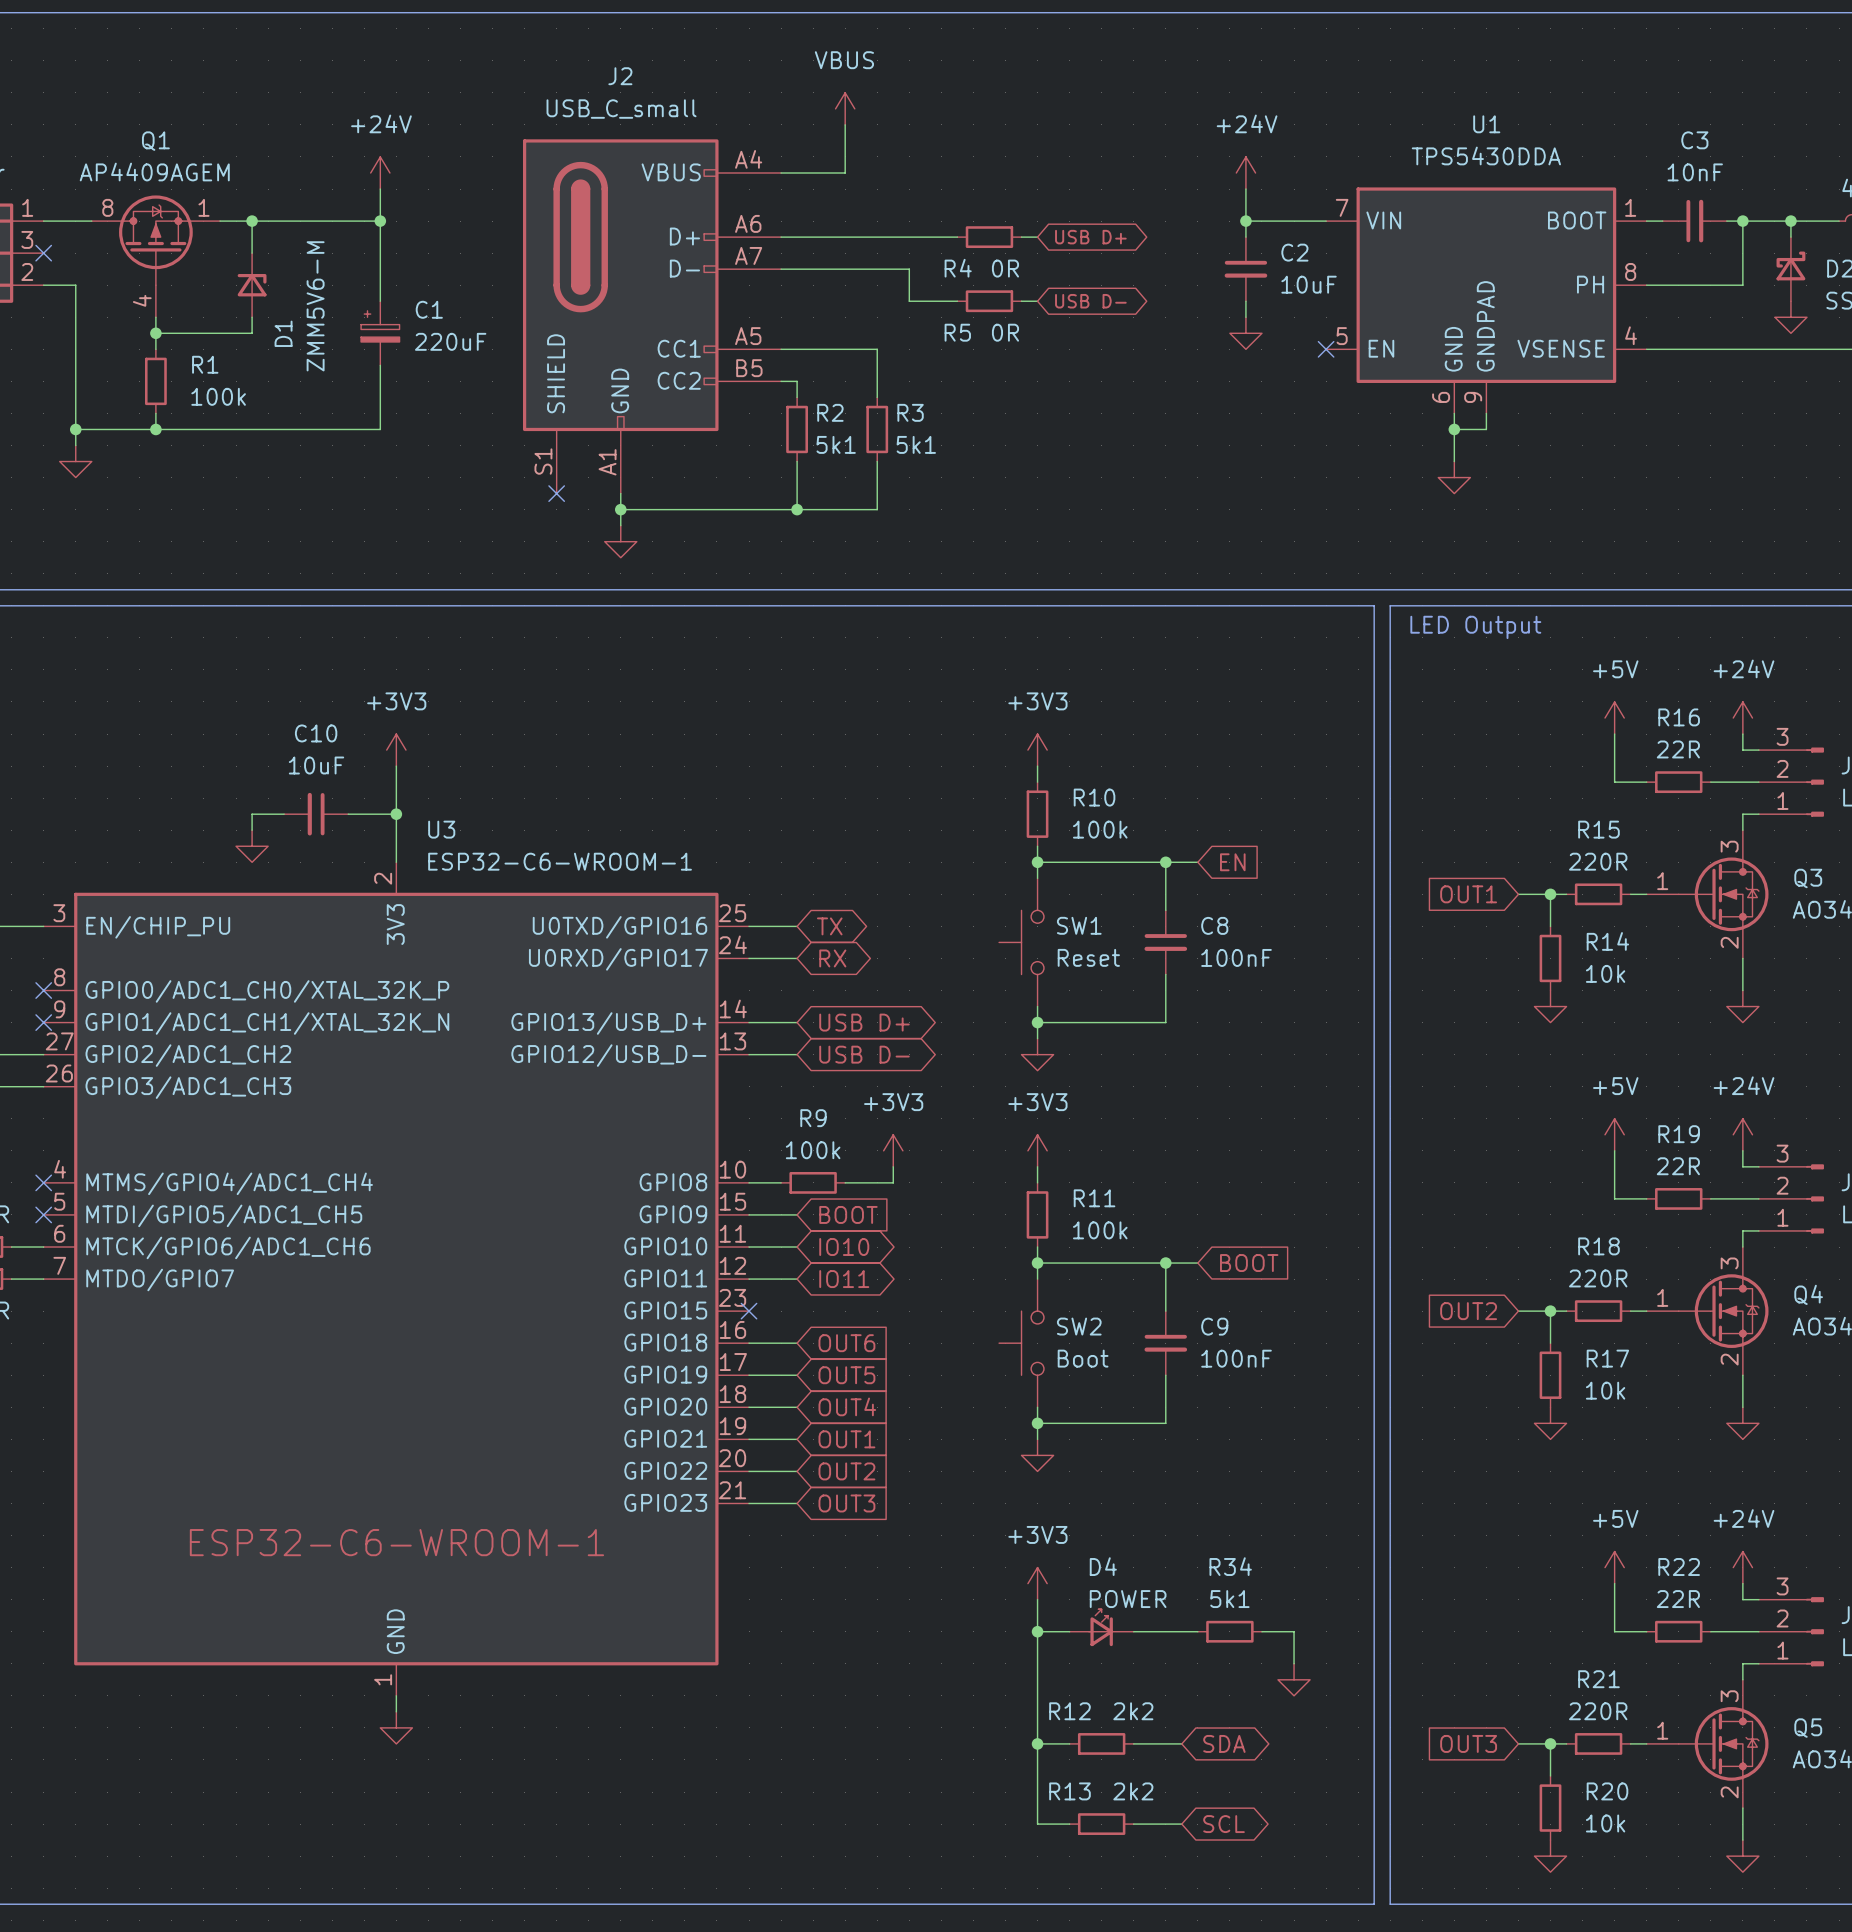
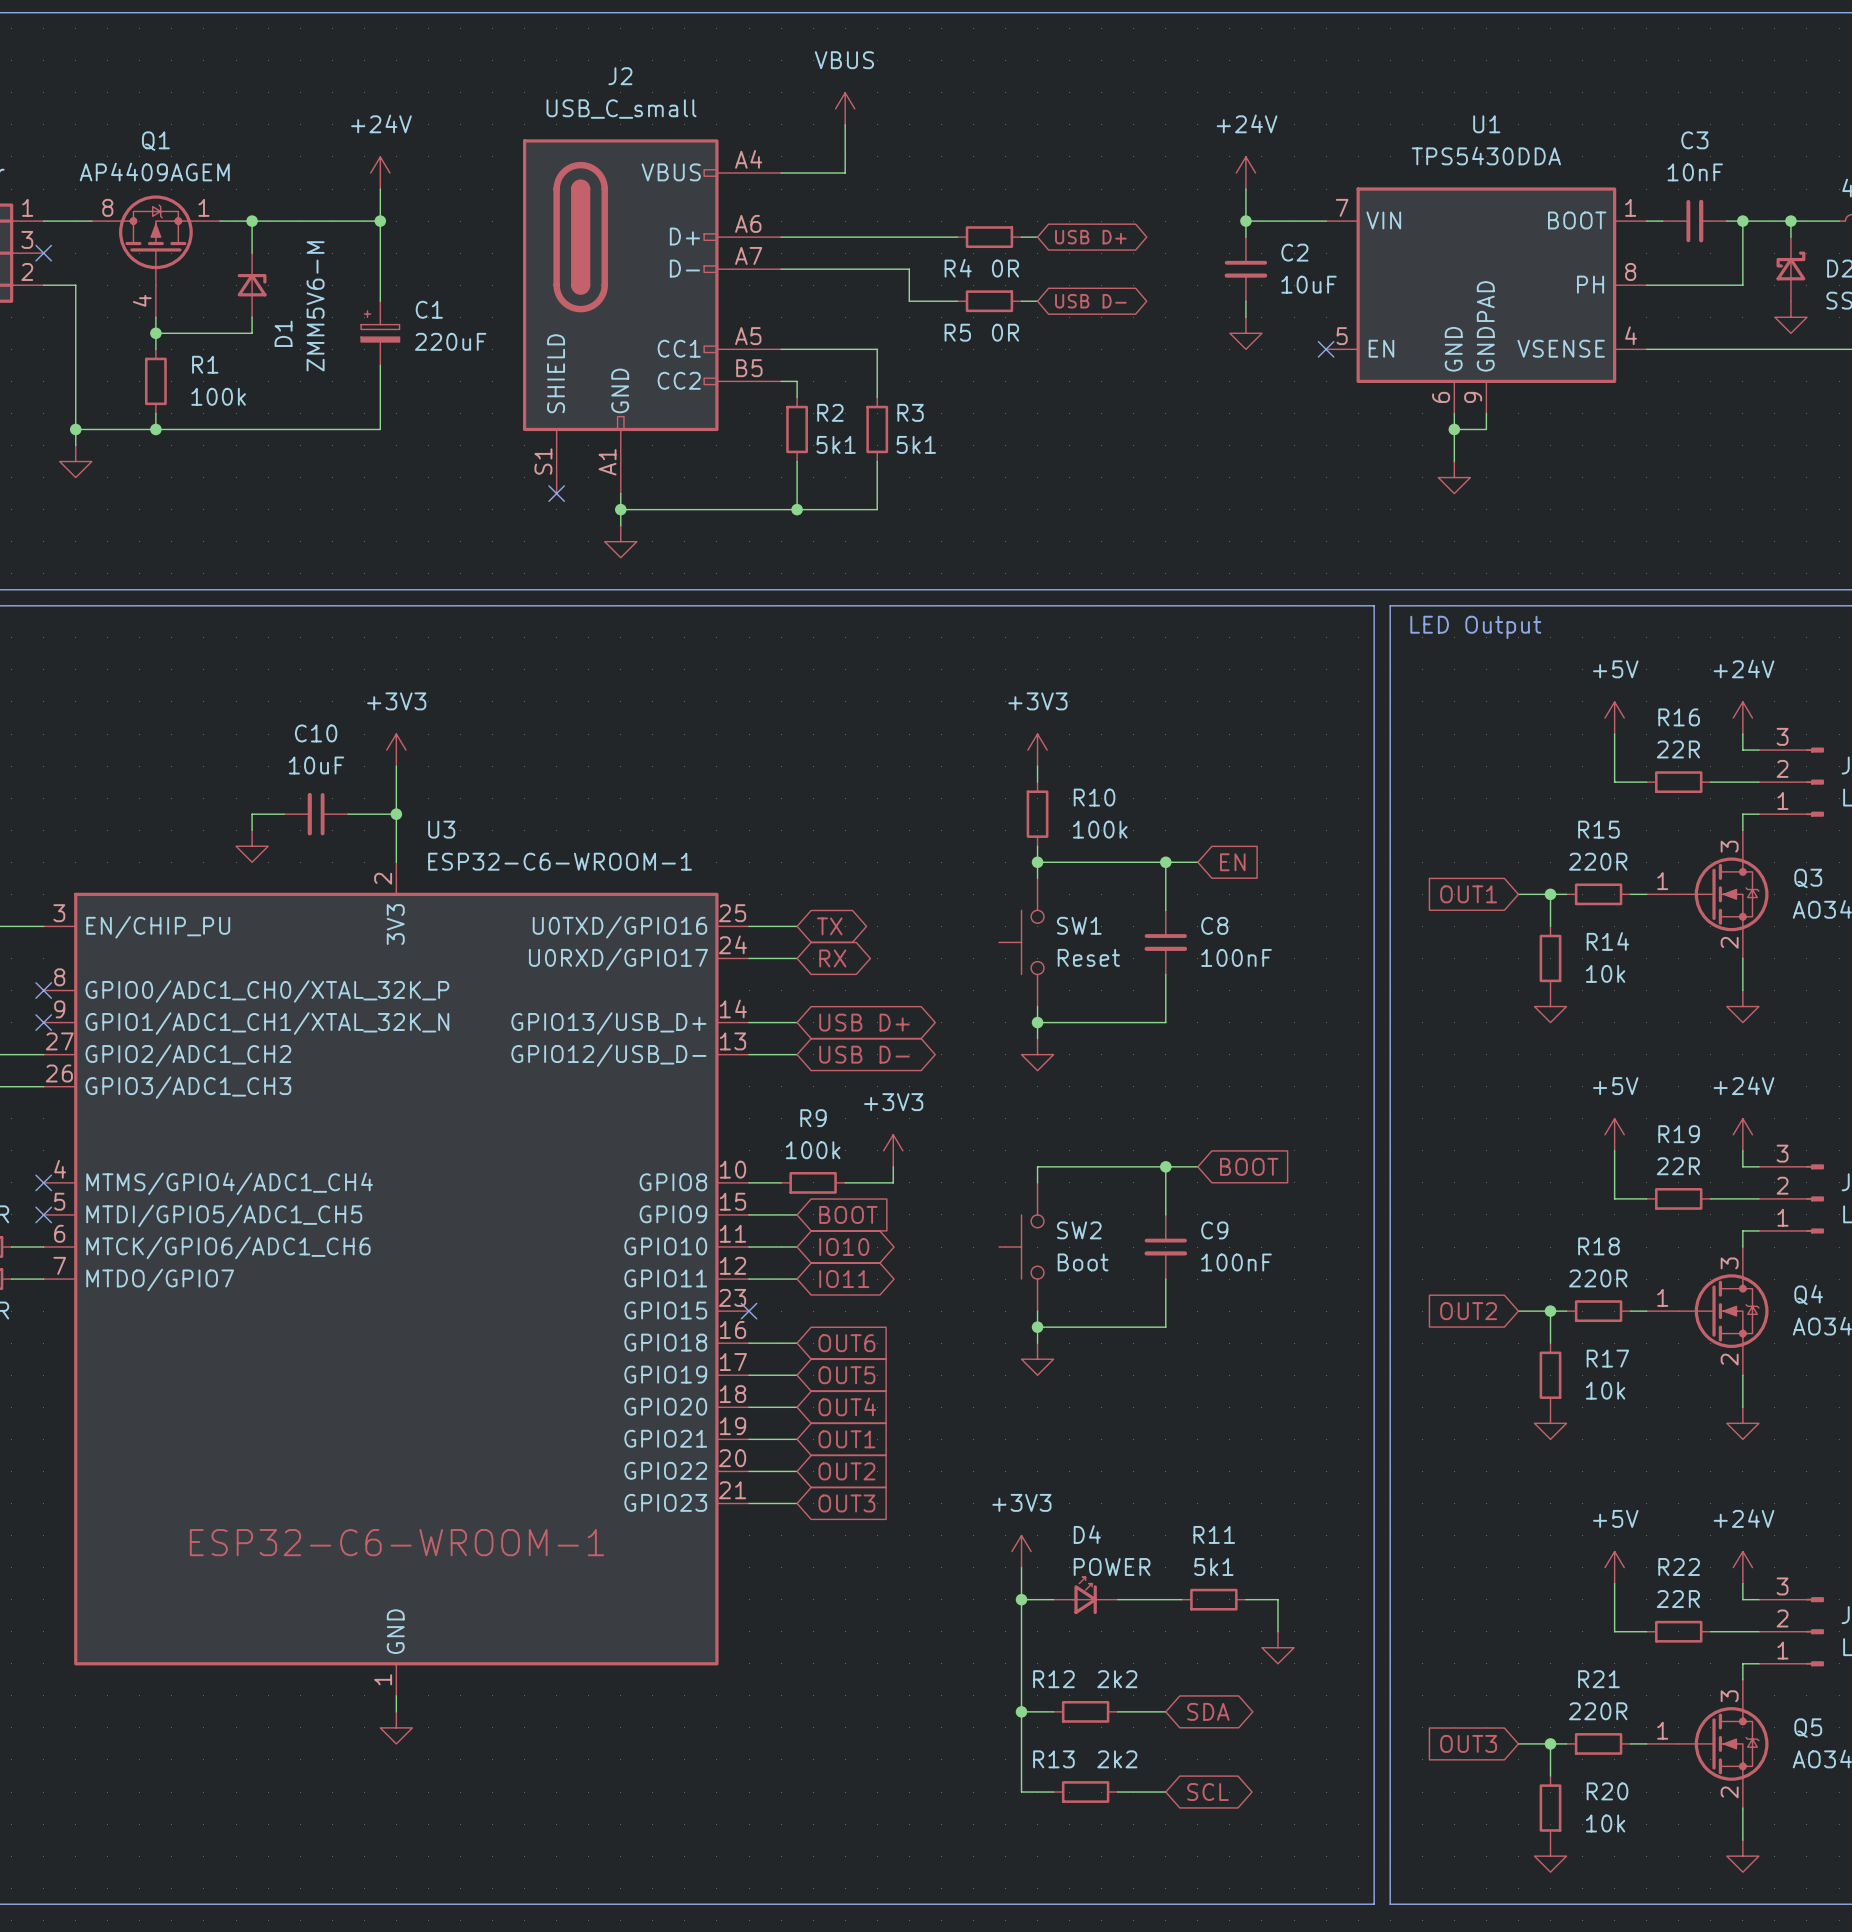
power symbol: +3V3 (1037, 1150) -> none
wire: none -> (1165, 1166) (1165, 1214)
junction: none -> (1165, 1166)
R11 name position: R11 (1094, 1198) -> R11 (1214, 1534)
R11 rotation: 0° (1037, 1214) -> 90° clockwise (1213, 1599)
R11 position: (1037, 1214) -> (1213, 1599)
R11 value: 100k (1100, 1230) -> 5k1 (1213, 1567)
wire: (1037, 1247) (1037, 1279) -> none
wire: (1037, 1263) (1197, 1263) -> (1037, 1166) (1197, 1166)
junction: (1037, 1263) -> none
junction: (1165, 1263) -> none
global label position: BOOT (1249, 1263) -> BOOT (1249, 1166)
wire: none -> (1165, 1311) (1165, 1327) (1037, 1327)
junction: none -> (1037, 1327)
SW2 position: (1021, 1343) -> (1021, 1247)
C9 position: (1165, 1343) -> (1165, 1247)
wire: (1165, 1375) (1165, 1423) (1037, 1423) -> none
wire: (1037, 1407) (1037, 1439) -> (1037, 1311) (1037, 1343)
junction: (1037, 1423) -> none
power symbol position: (1037, 1455) -> (1037, 1359)
power symbol position: +3V3 (1037, 1583) -> +3V3 (1021, 1551)
wire: (1037, 1599) (1037, 1824) (1069, 1824) -> (1021, 1567) (1021, 1792) (1053, 1792)
D4 position: (1101, 1627) -> (1085, 1595)
wire: (1037, 1631) (1069, 1631) -> (1021, 1599) (1053, 1599)
junction position: (1037, 1631) -> (1021, 1599)
wire: (1133, 1631) (1197, 1631) -> (1117, 1599) (1181, 1599)
R34: 5k1 (1229, 1631) -> none
wire: (1261, 1631) (1294, 1631) (1294, 1663) -> (1245, 1599) (1277, 1599) (1277, 1631)
power symbol position: (1294, 1679) -> (1277, 1647)
wire: (1037, 1743) (1069, 1743) -> (1021, 1711) (1053, 1711)
junction position: (1037, 1743) -> (1021, 1711)
R12 position: (1101, 1743) -> (1085, 1711)
wire: (1133, 1743) (1181, 1743) -> (1117, 1711) (1165, 1711)
global label position: SDA (1224, 1743) -> SDA (1208, 1711)
R13 position: (1101, 1824) -> (1085, 1792)
wire: (1133, 1824) (1181, 1824) -> (1117, 1792) (1165, 1792)
global label position: SCL (1224, 1824) -> SCL (1207, 1792)

